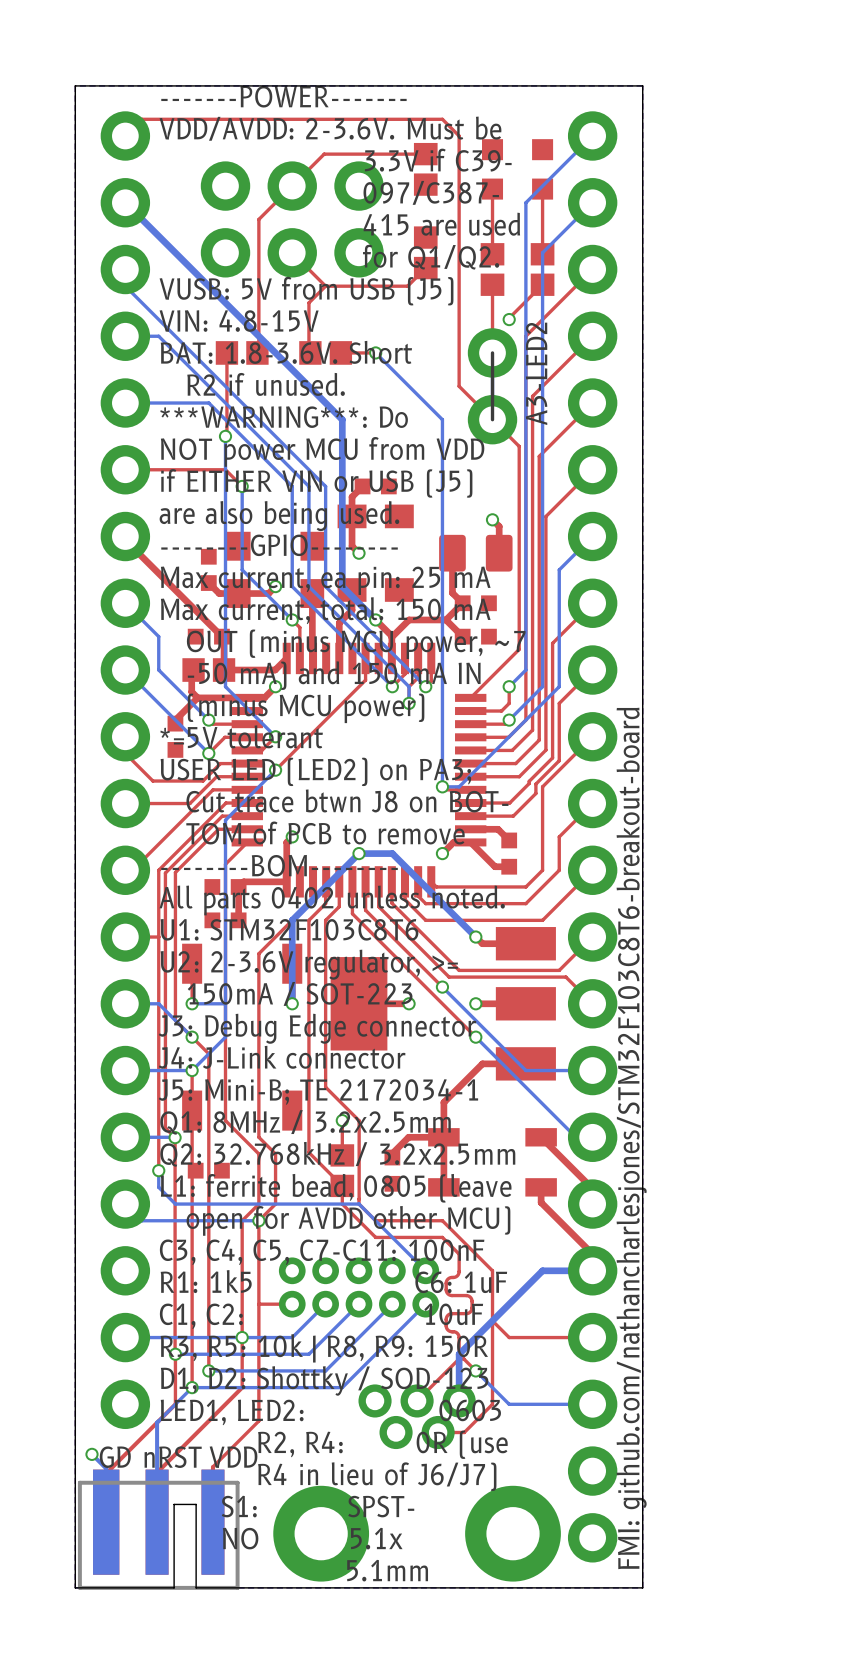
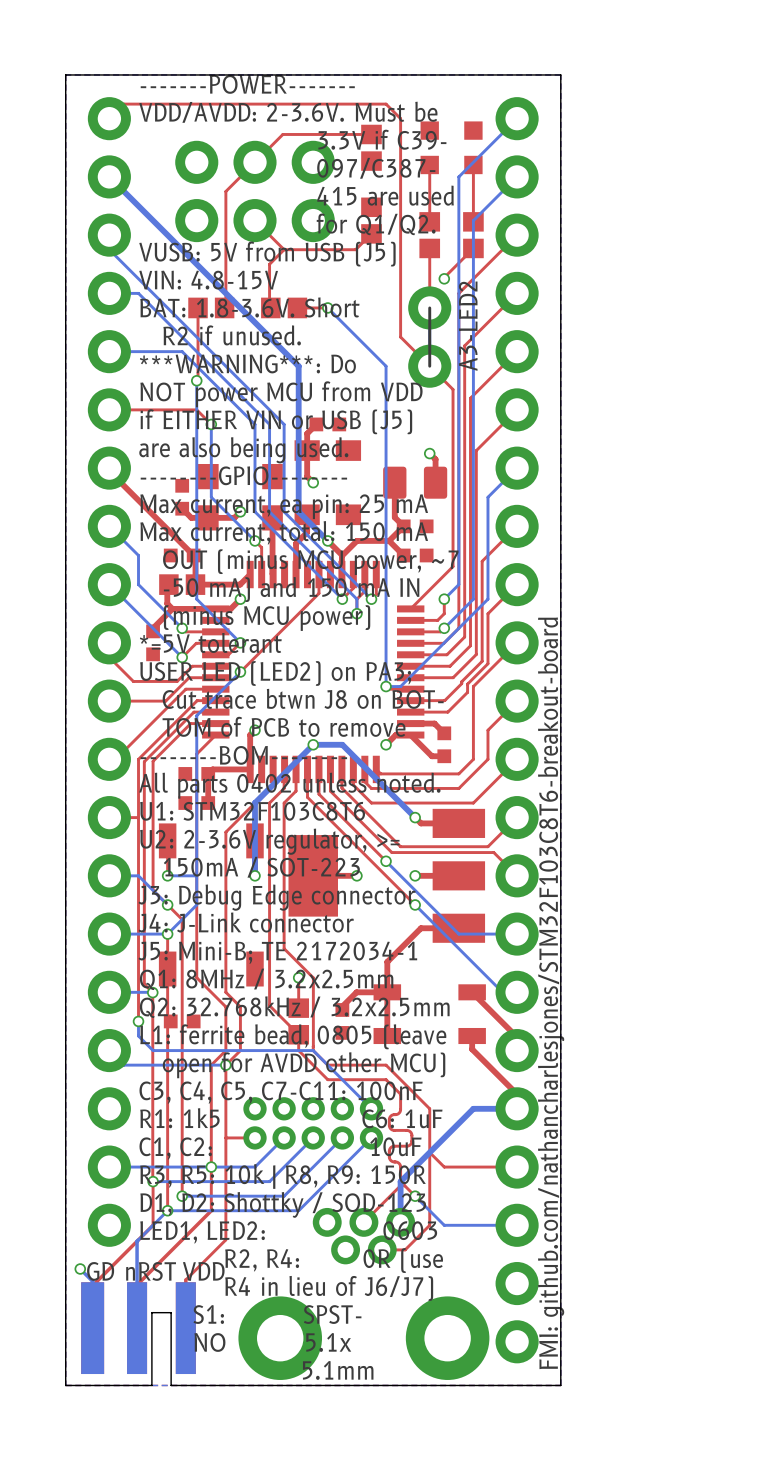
part footprint: [77, 1469, 240, 1590] -> [81, 1282, 196, 1375]

